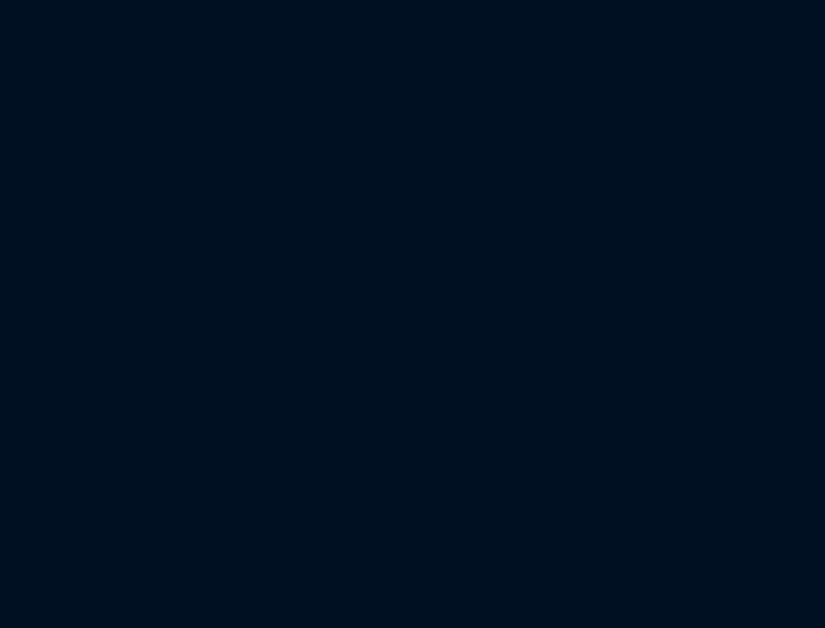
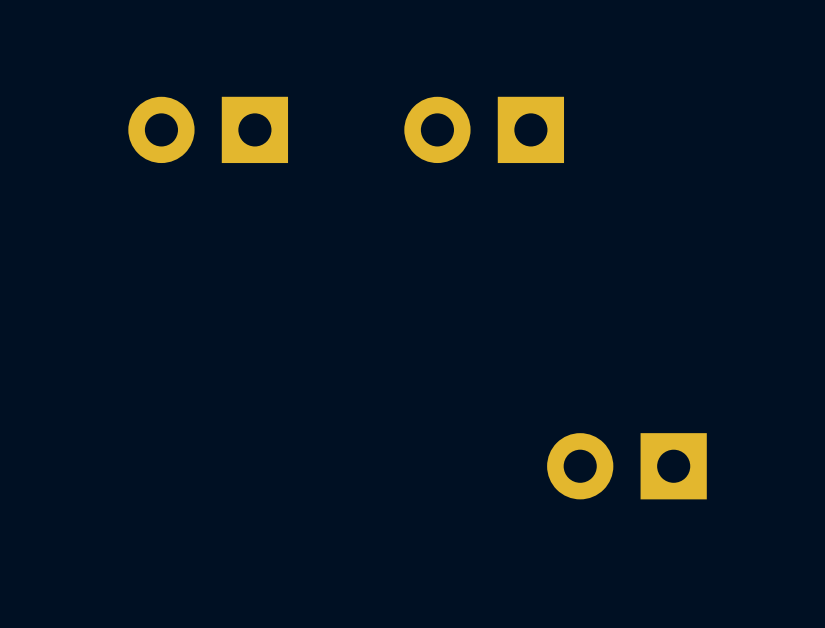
part: none -> (208, 129)
part: none -> (484, 129)
part: none -> (626, 466)

